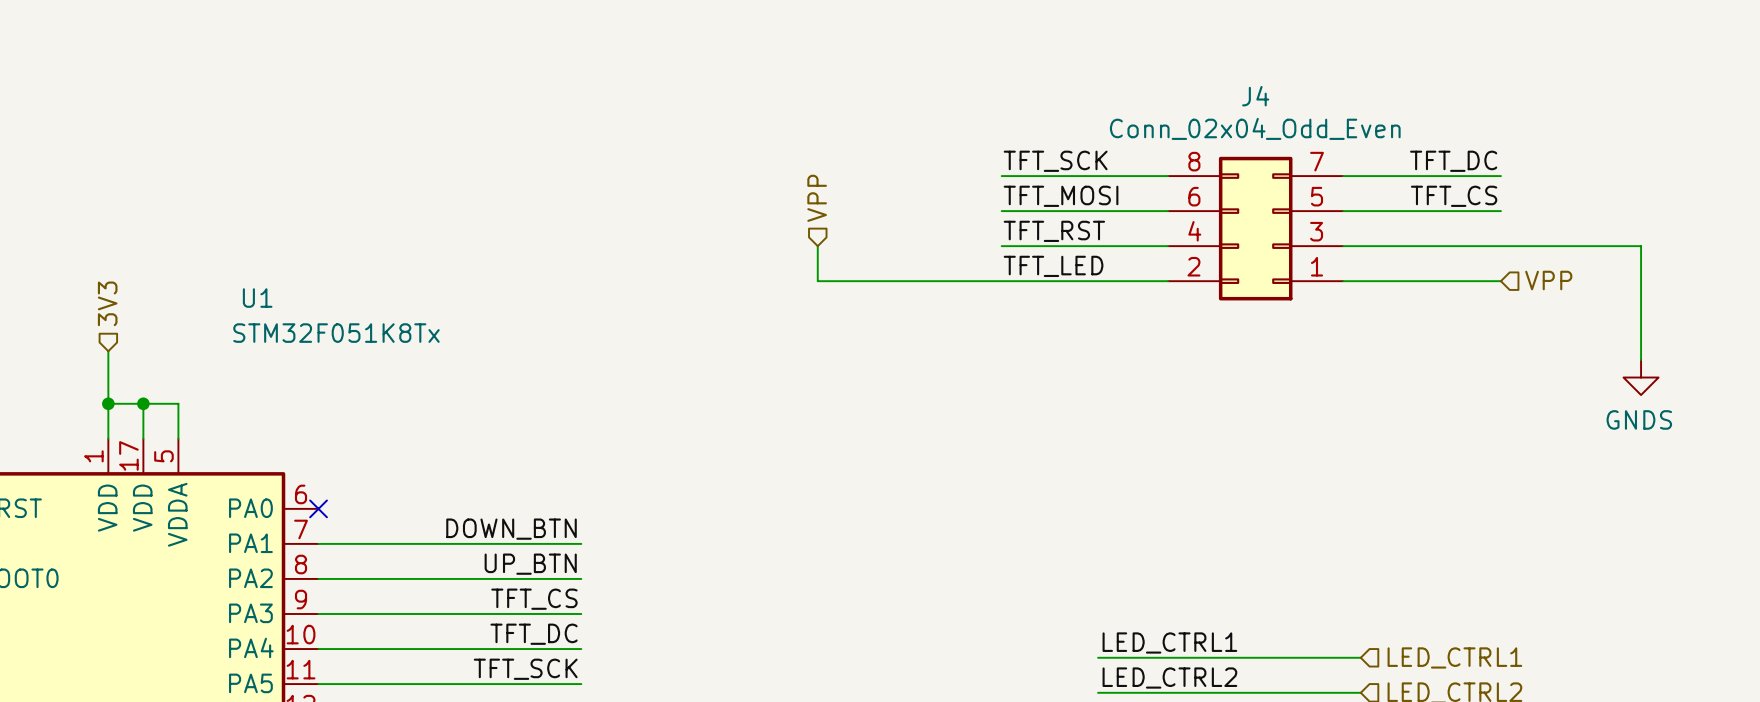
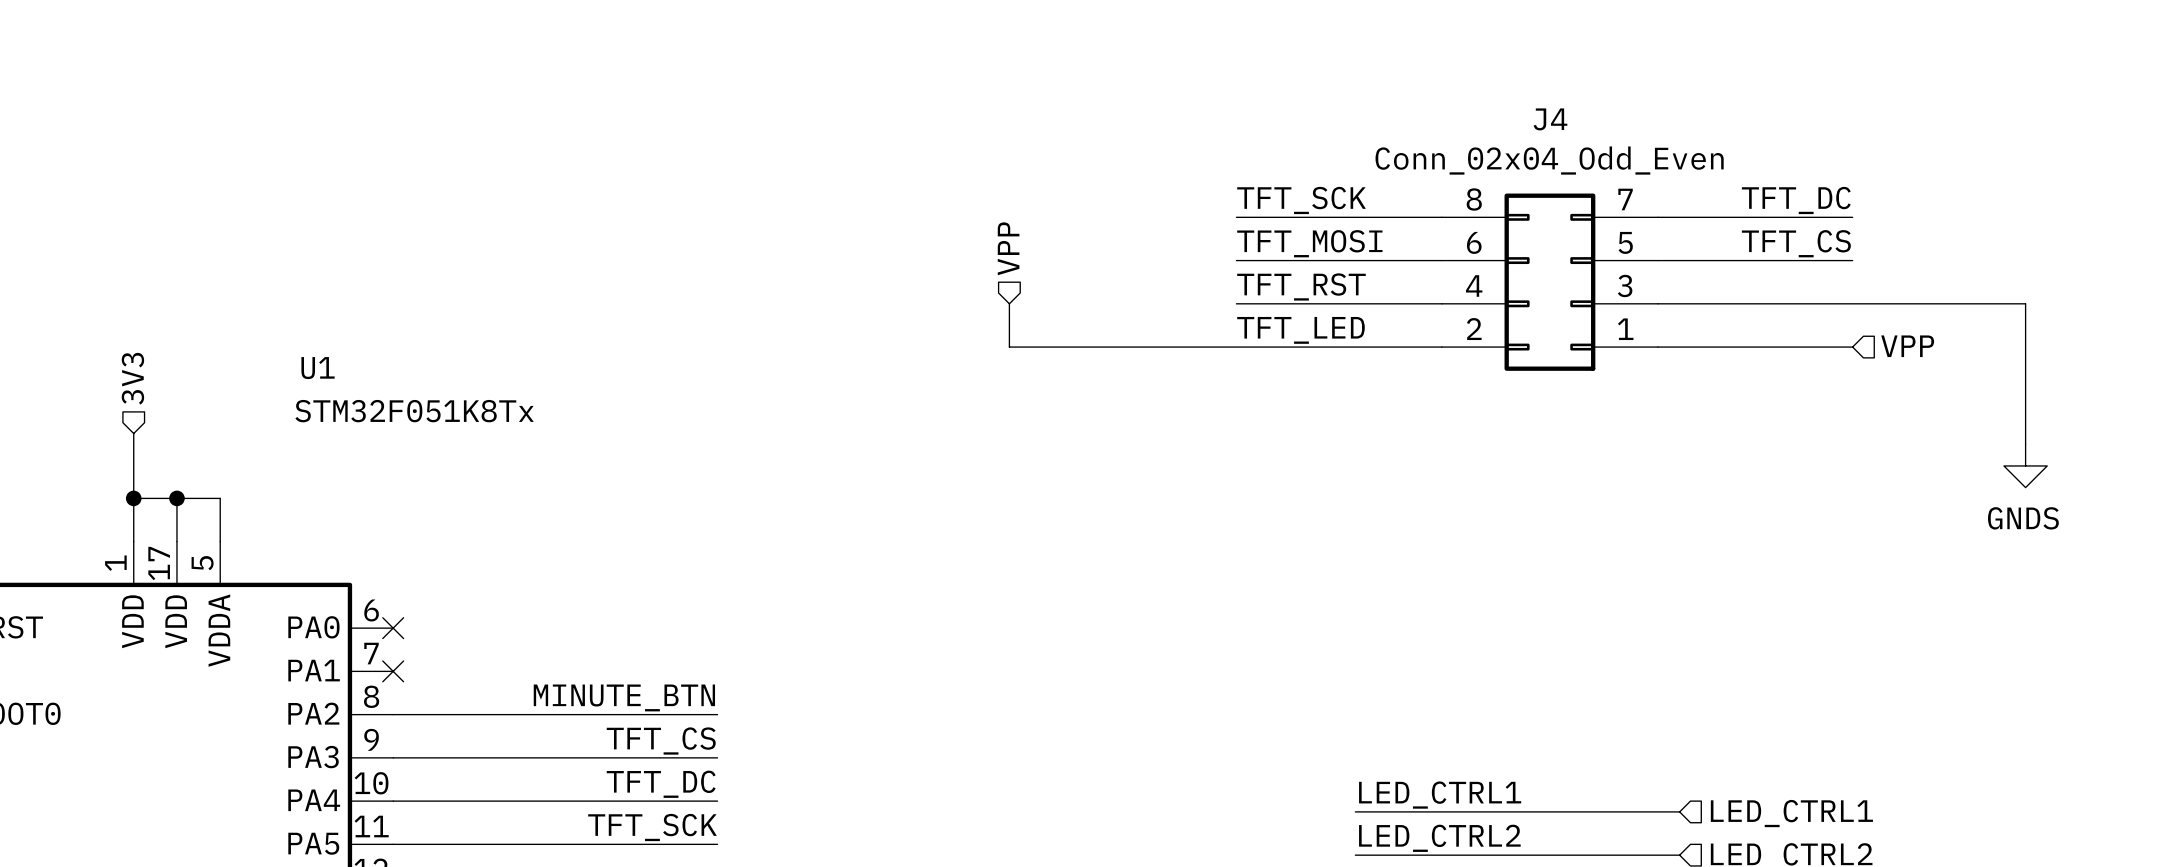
label: DOWN_BTN (511, 529) -> none
wire: (318, 543) (581, 543) -> none
no-connect mark: none -> (393, 671)
label: UP_BTN (530, 564) -> MINUTE_BTN (624, 697)

